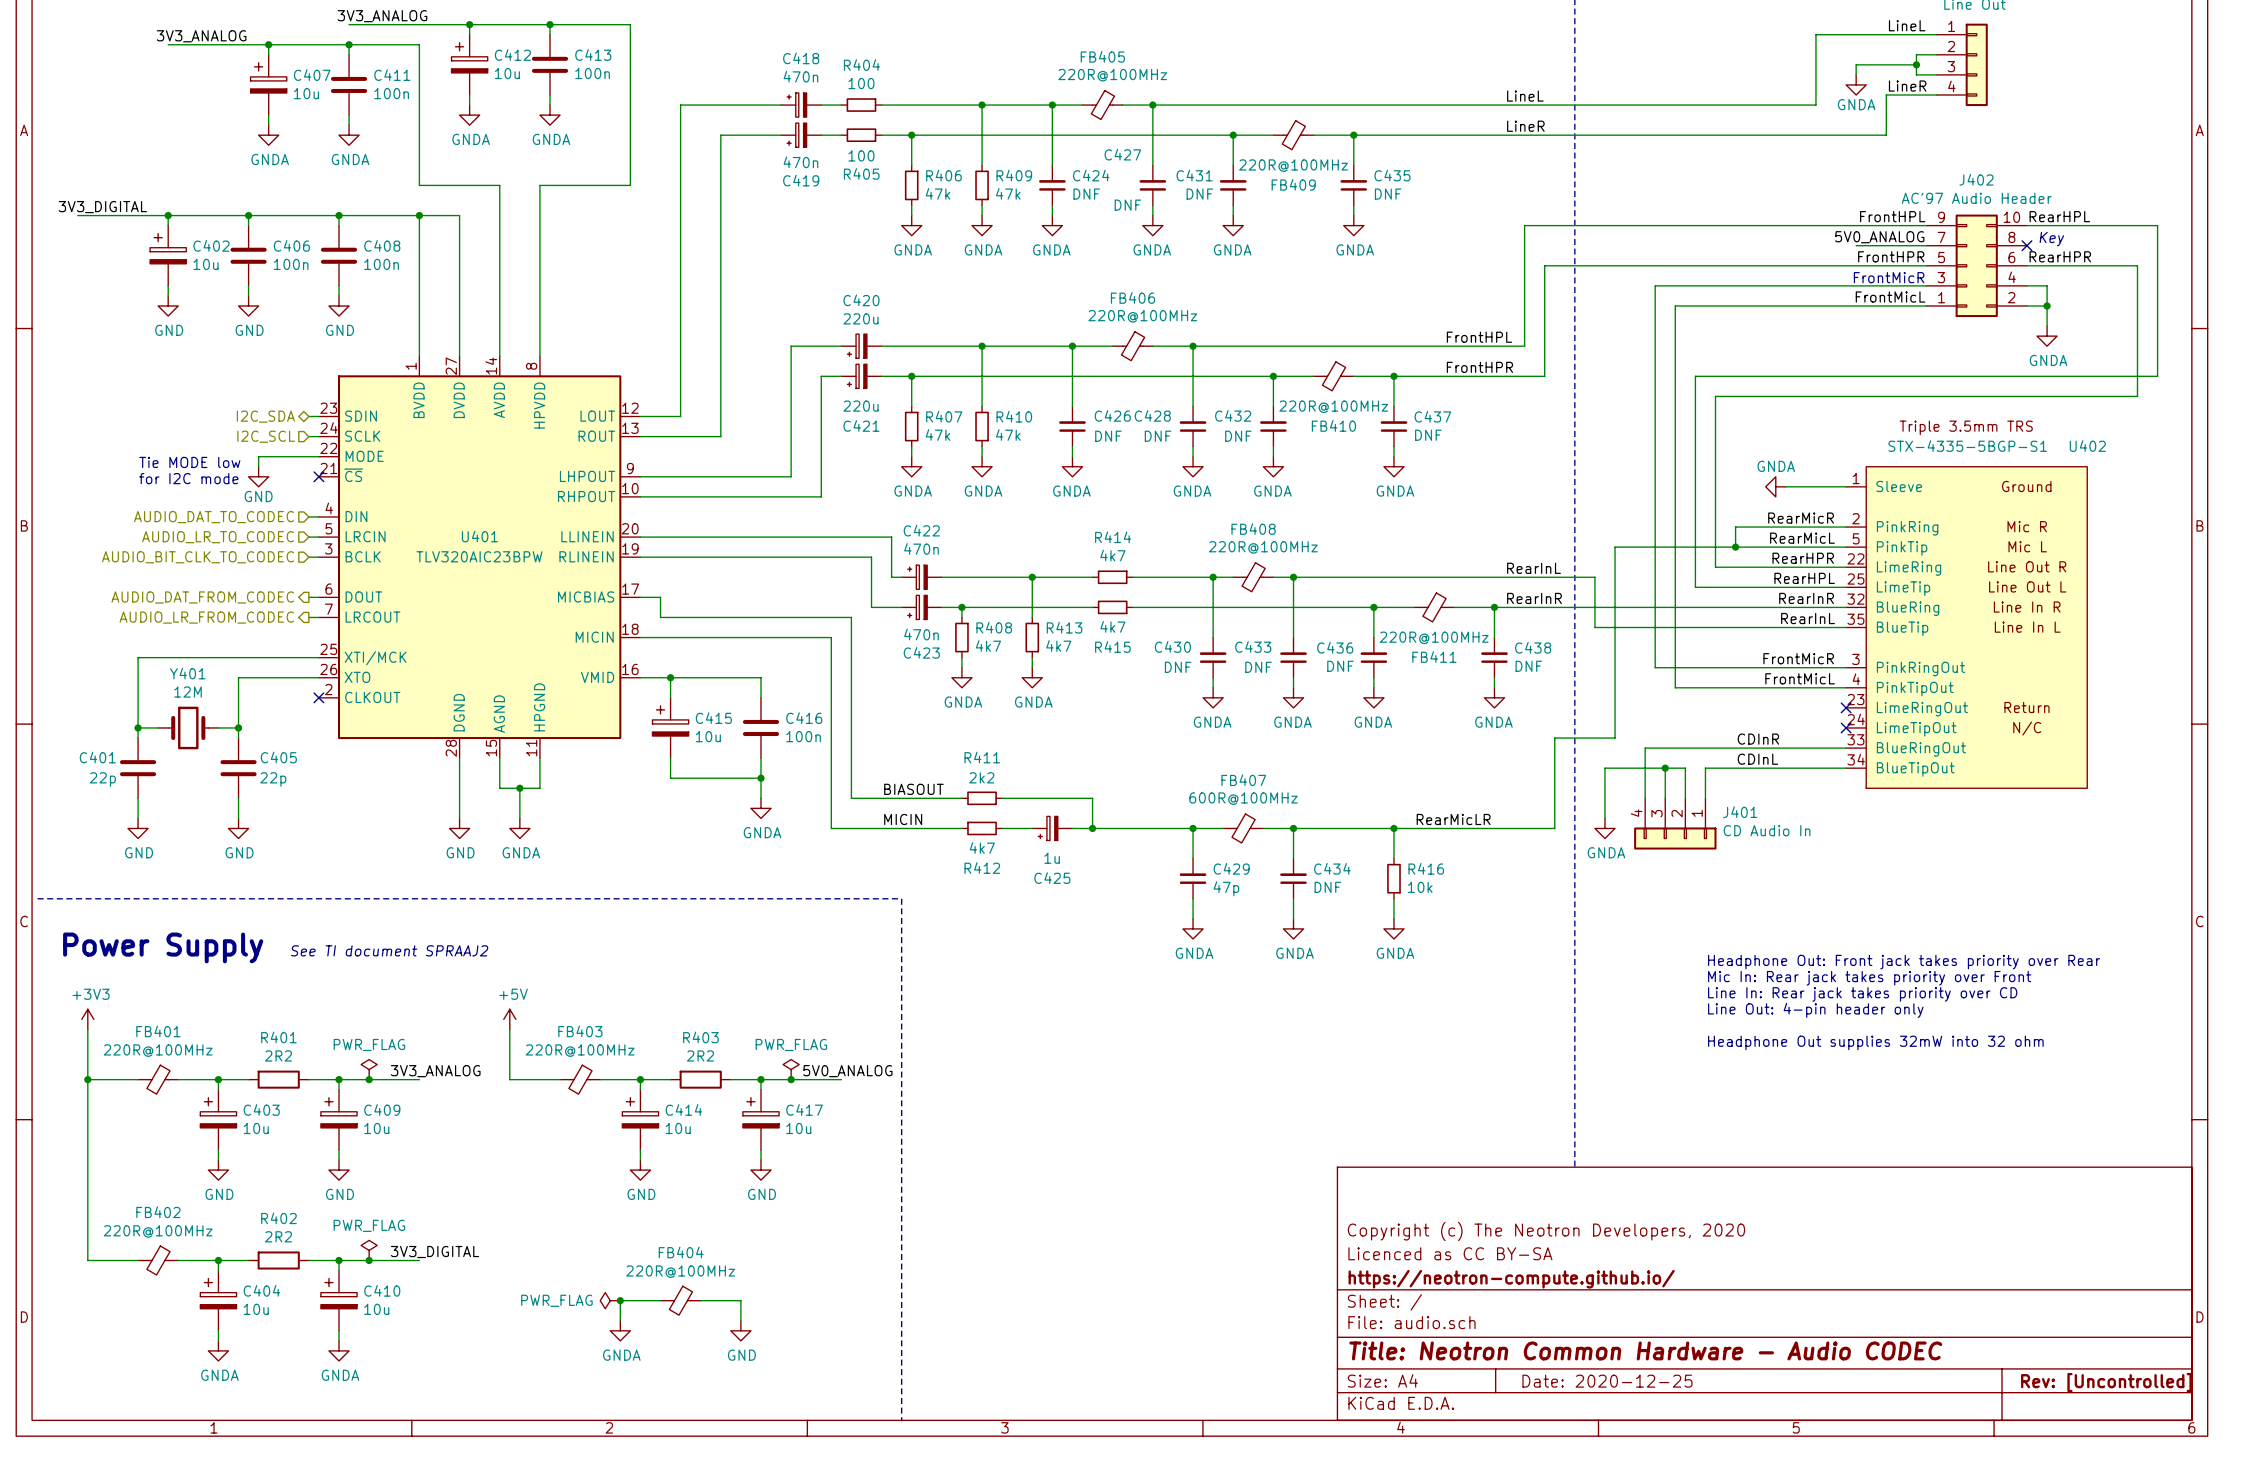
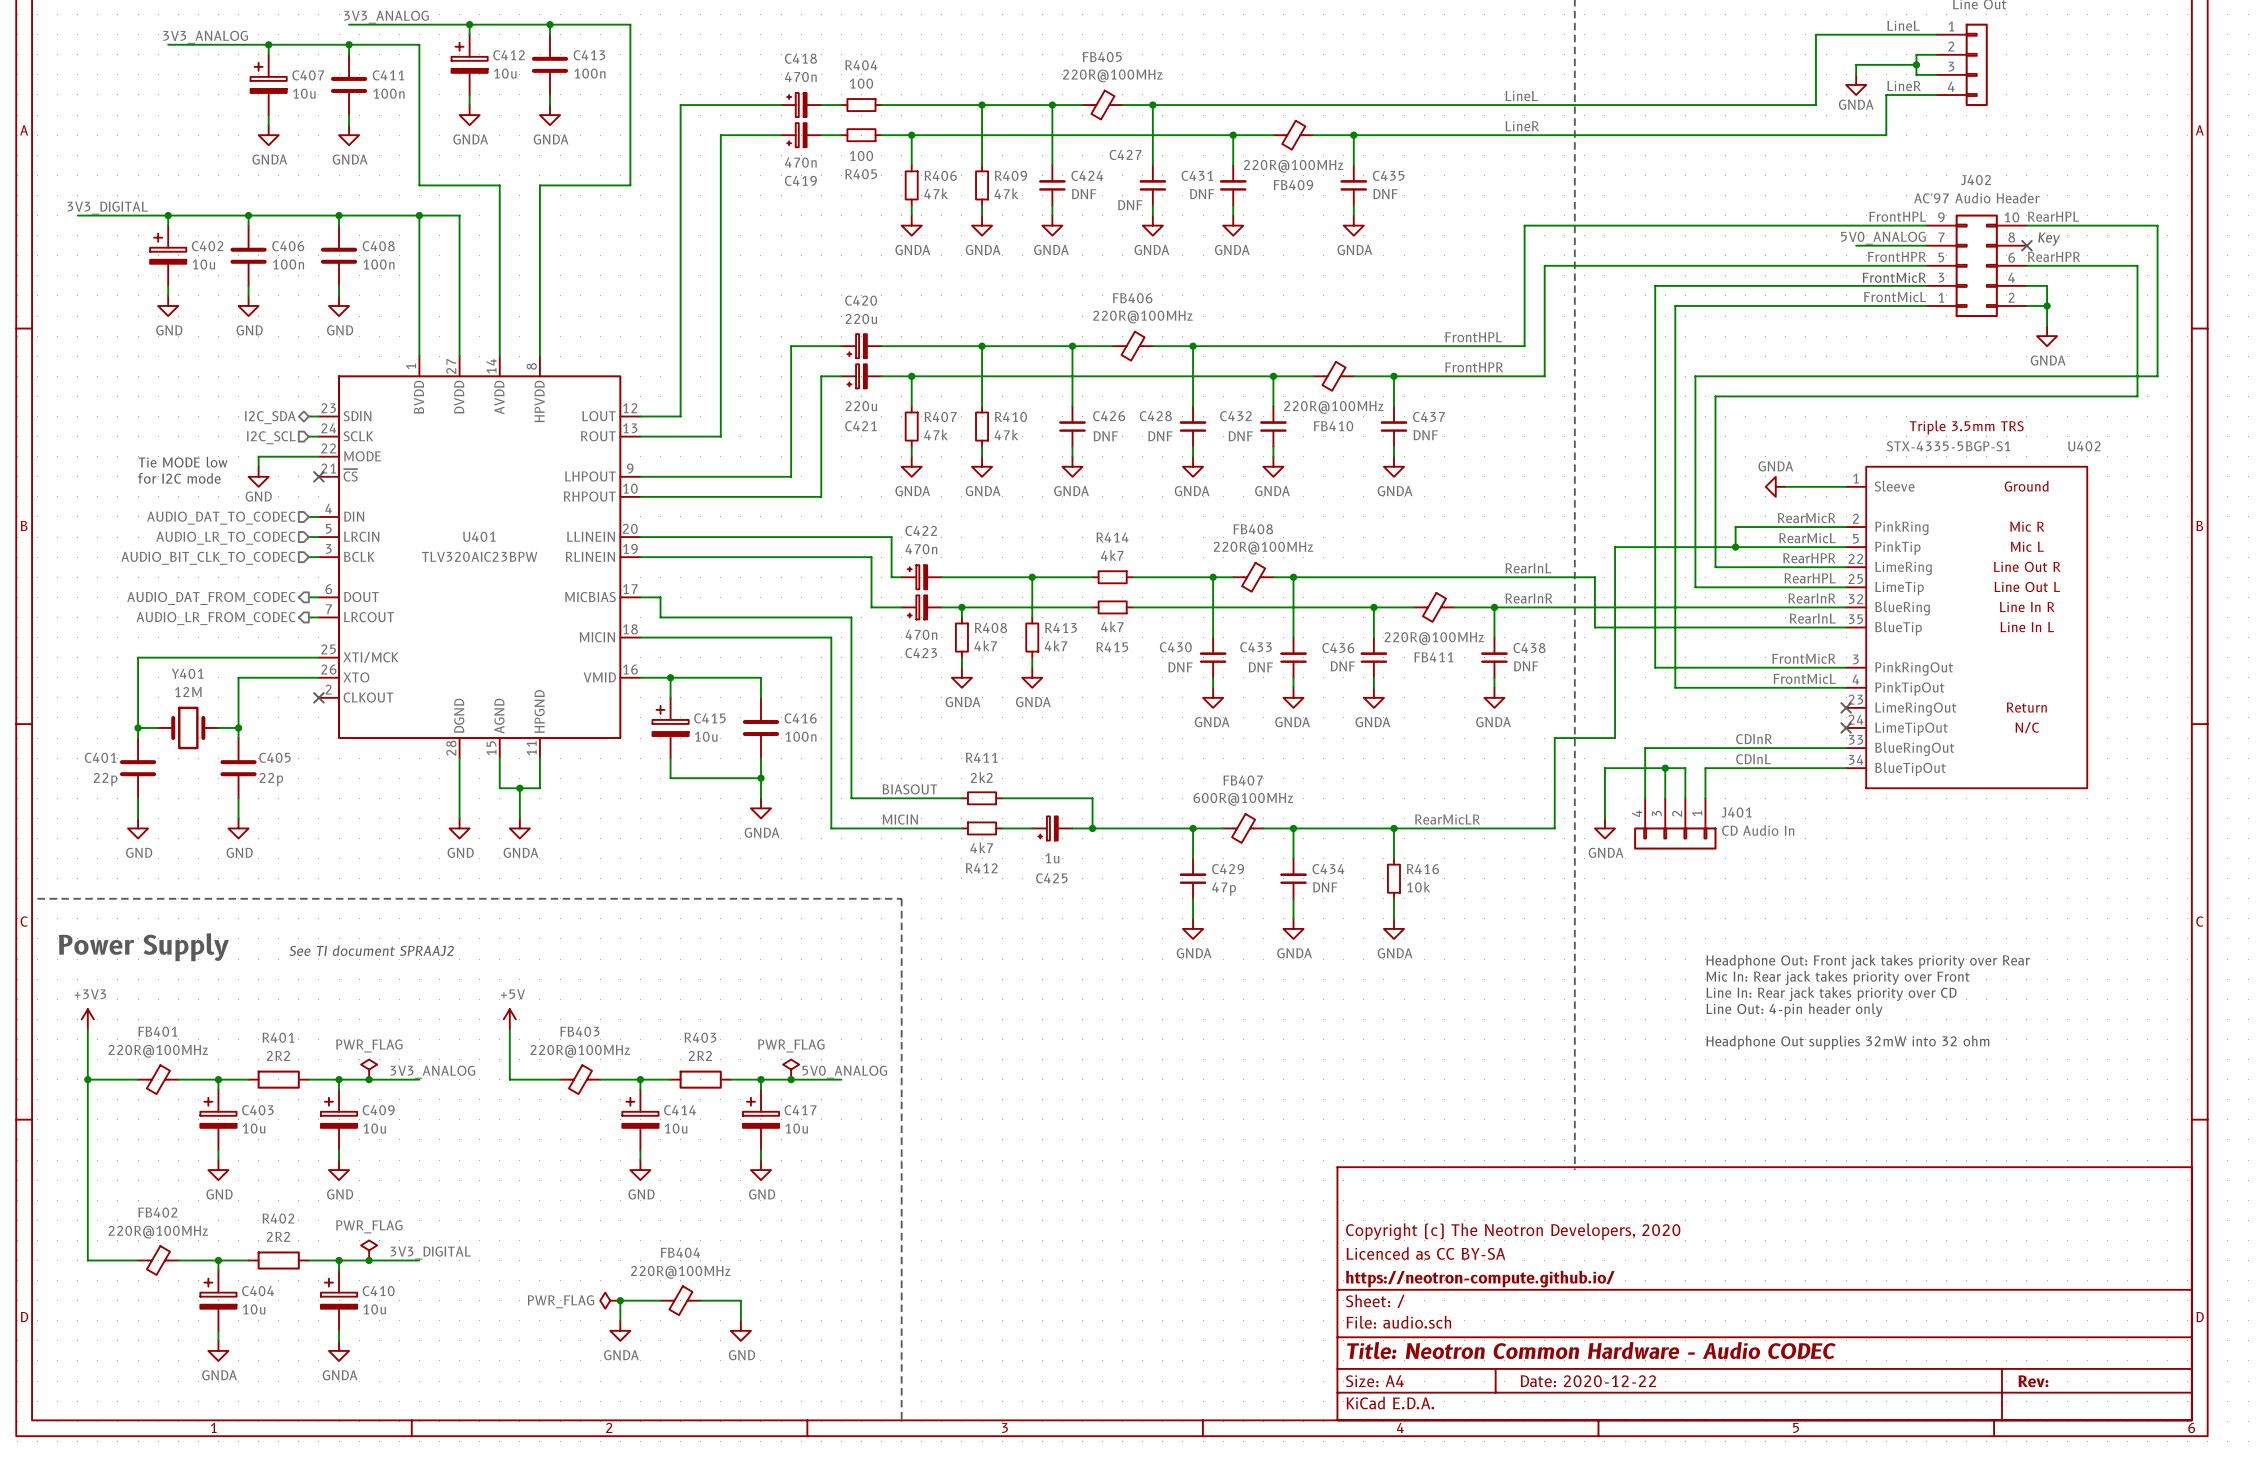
title block: Date: 2020-12-25 (1607, 1381) -> Date: 2020-12-22 (1588, 1381)
title block: Rev: [Uncontrolled] (2106, 1382) -> Rev: (2033, 1381)

